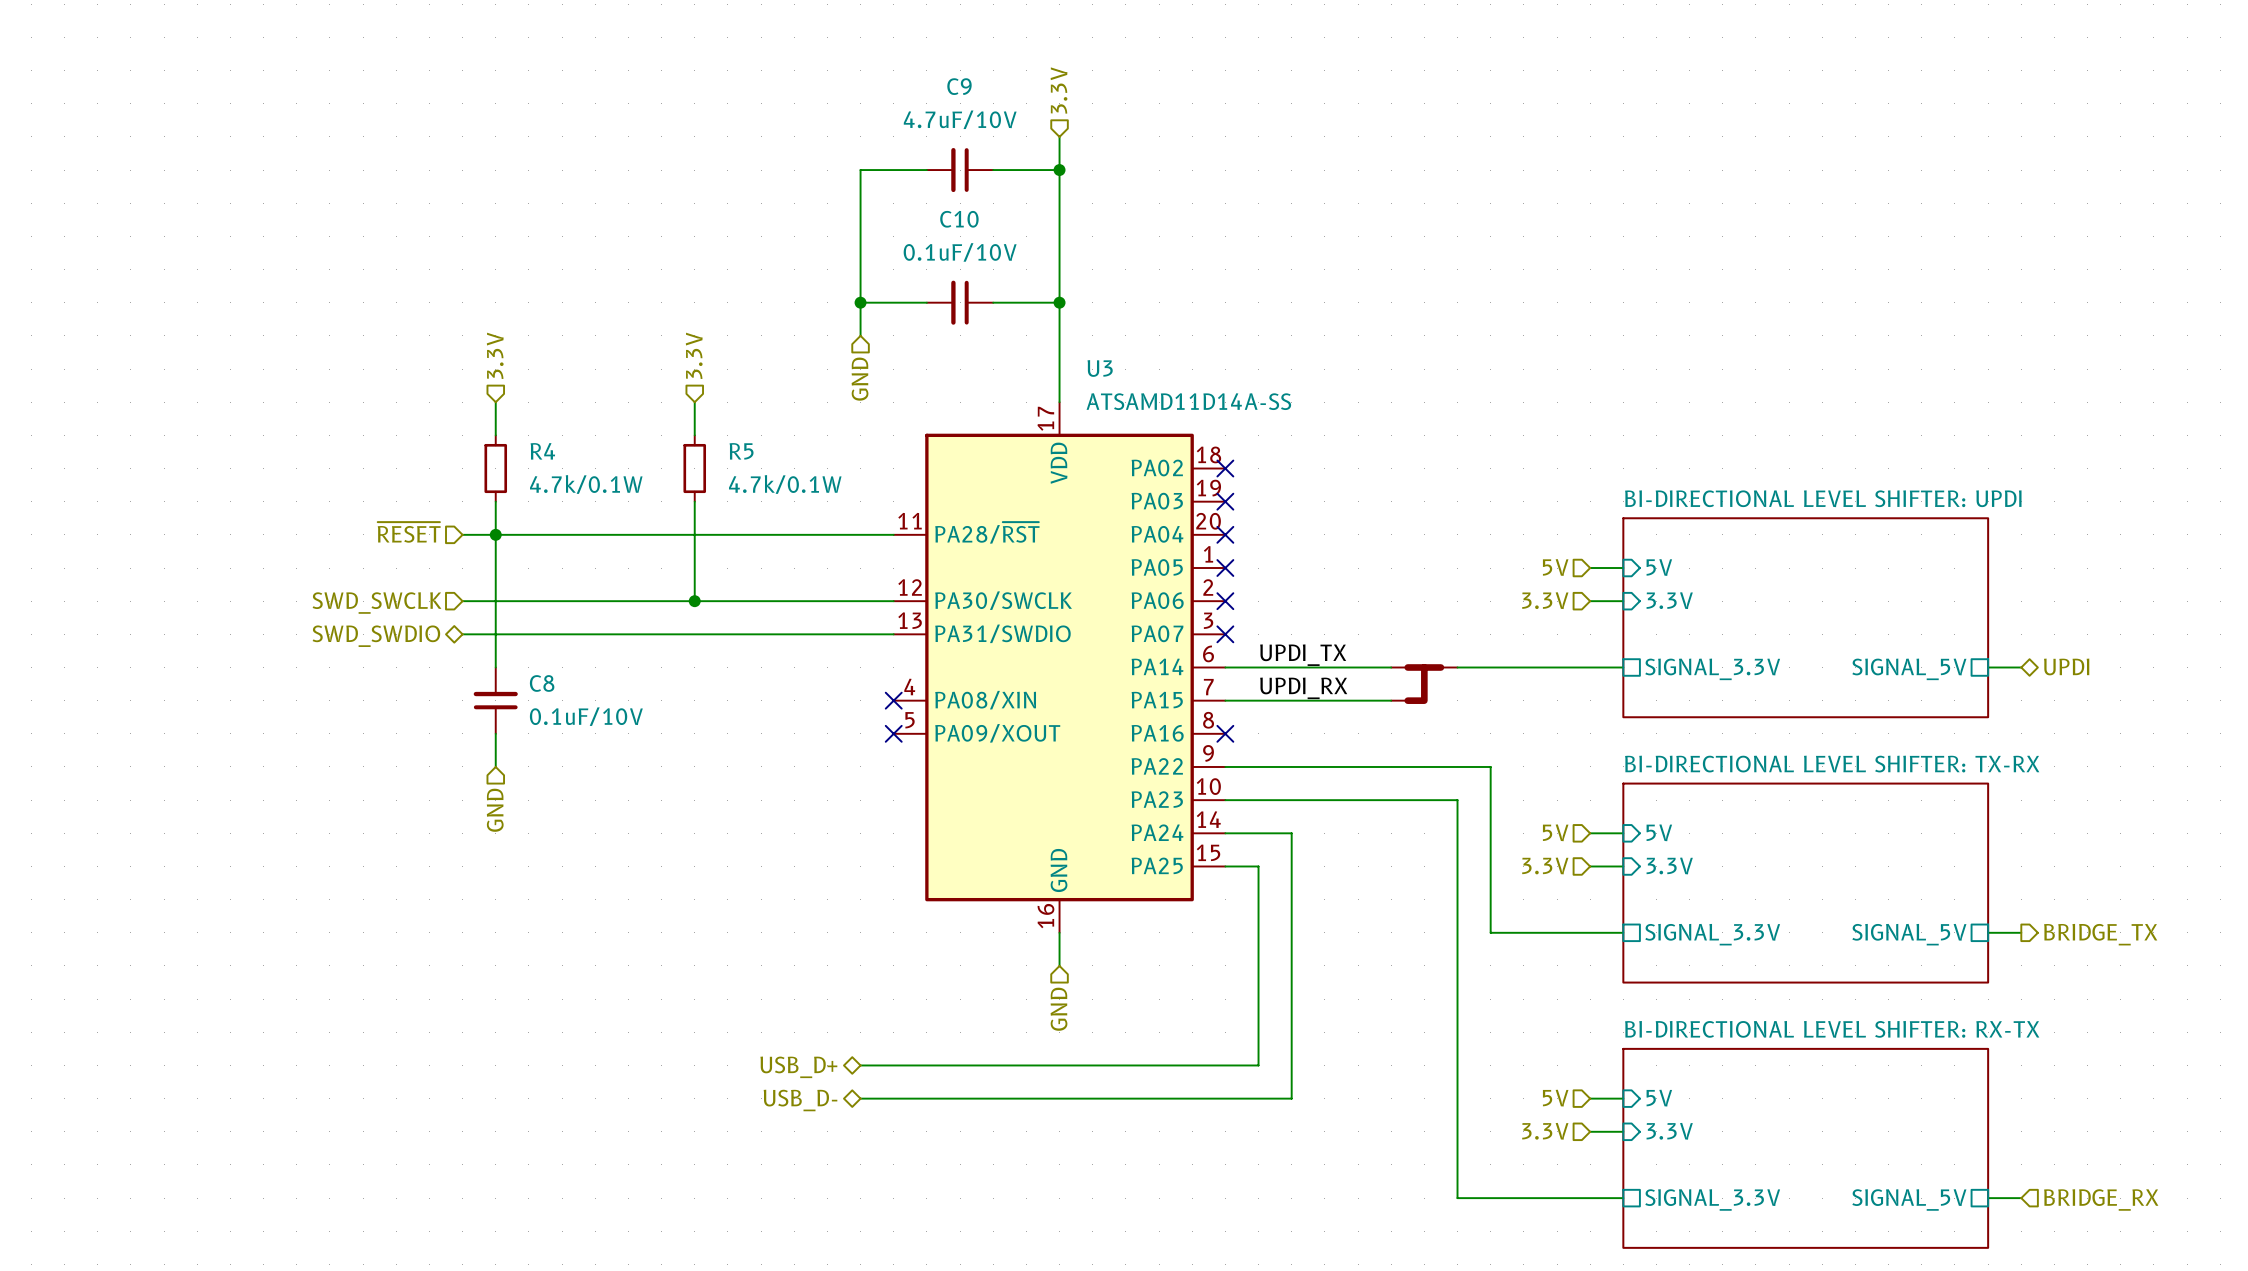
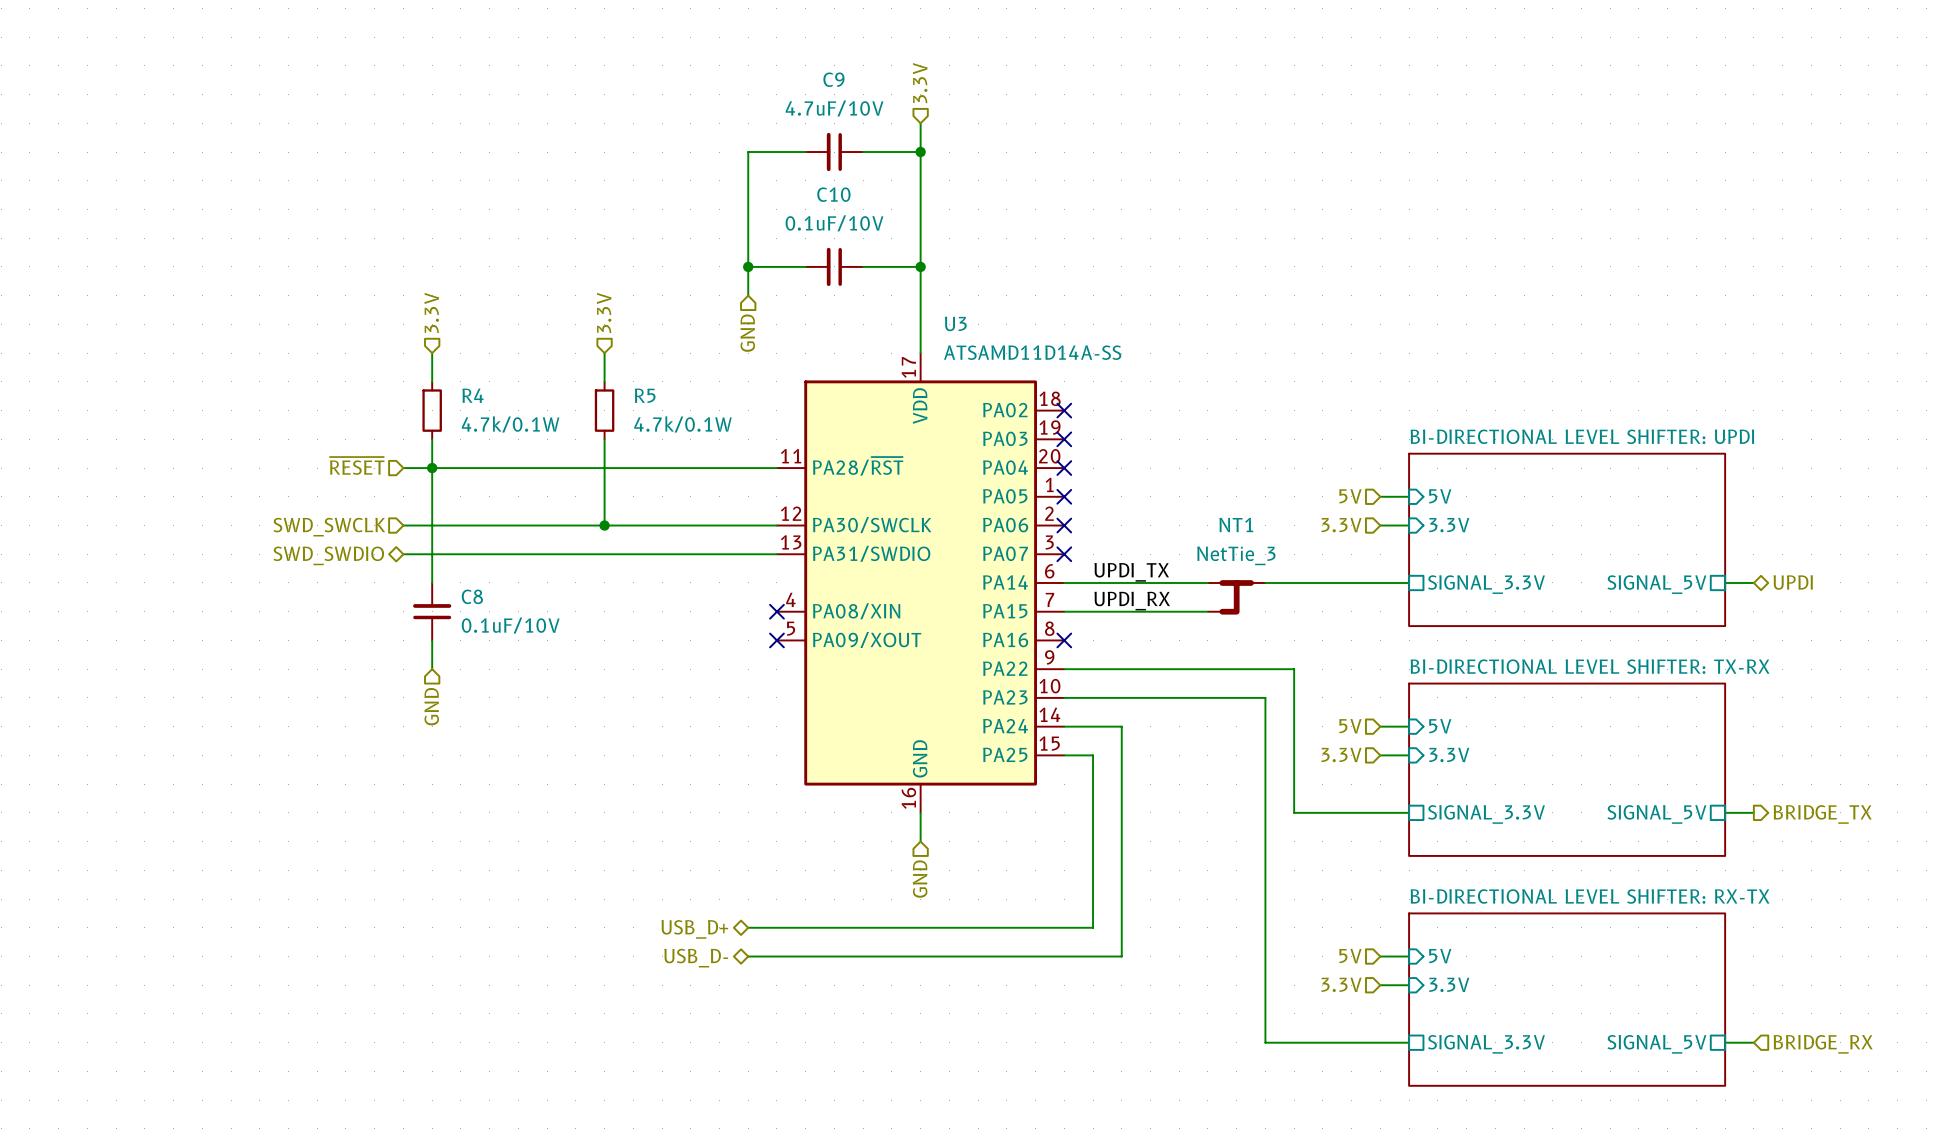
NT1 name: none -> NT1 (1236, 524)
NT1 value: none -> NetTie_3 (1236, 555)

